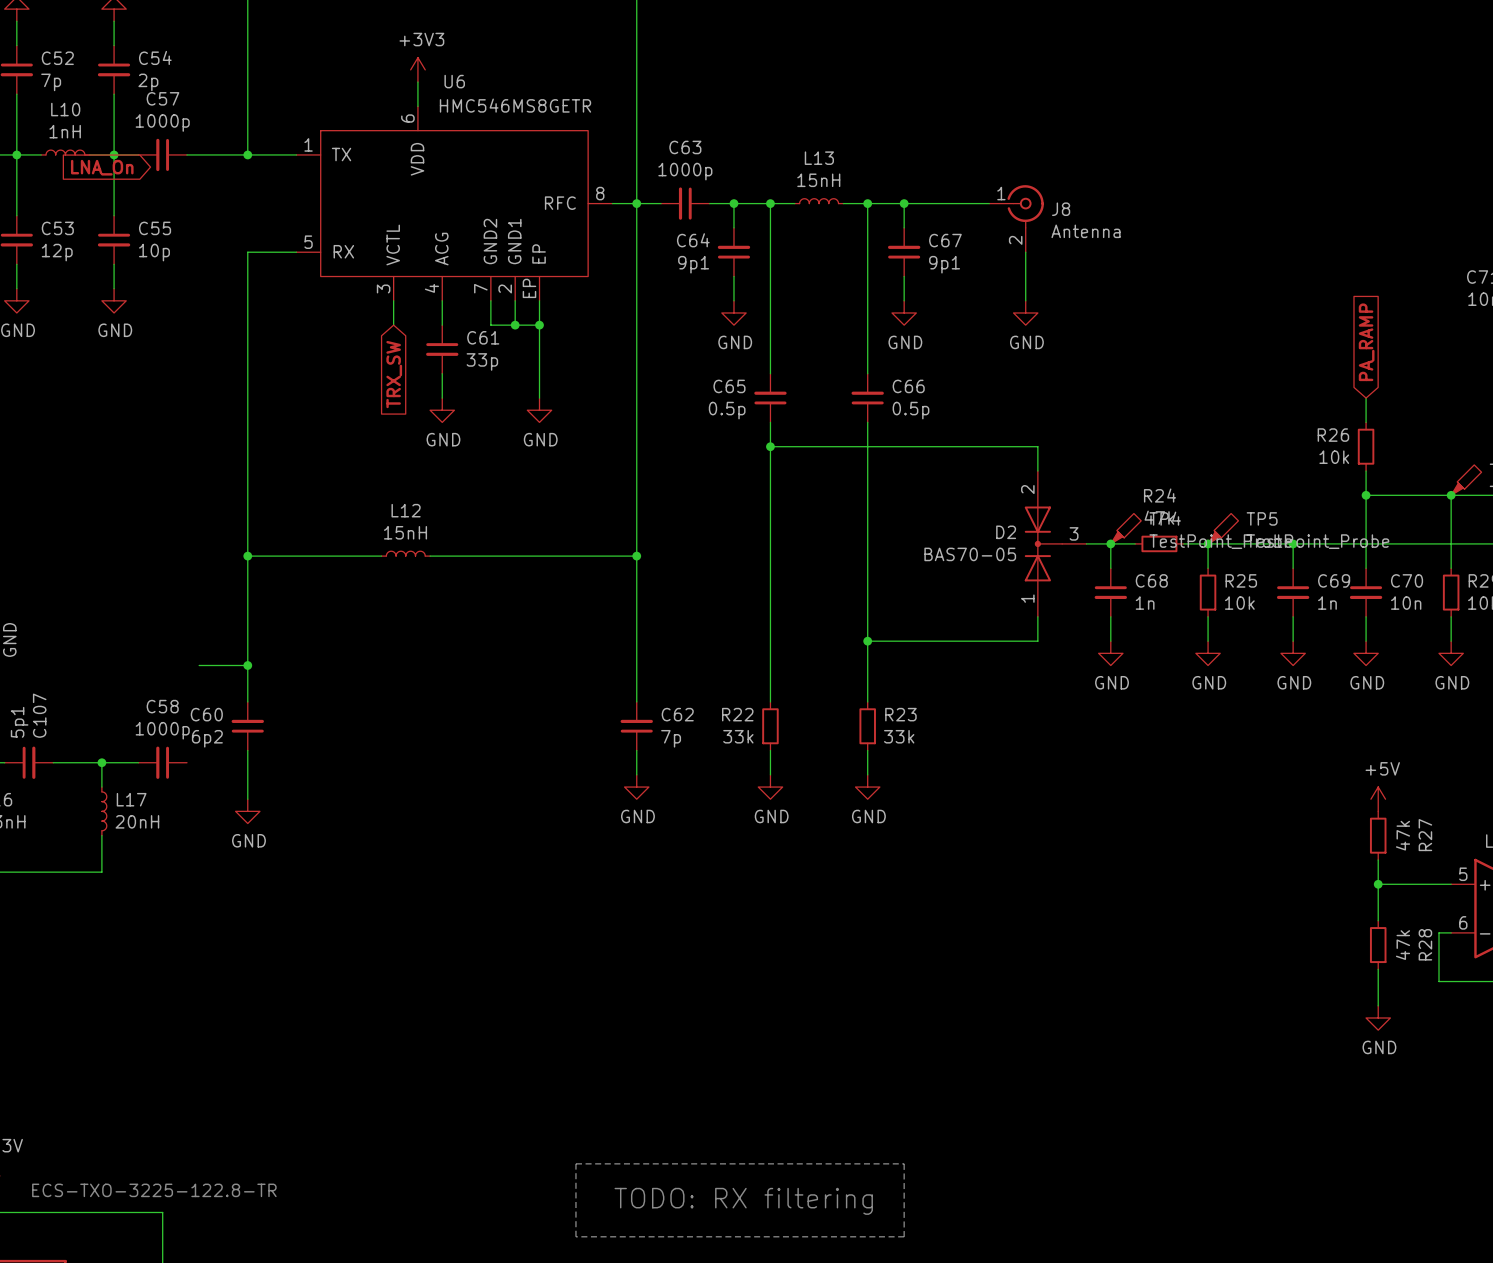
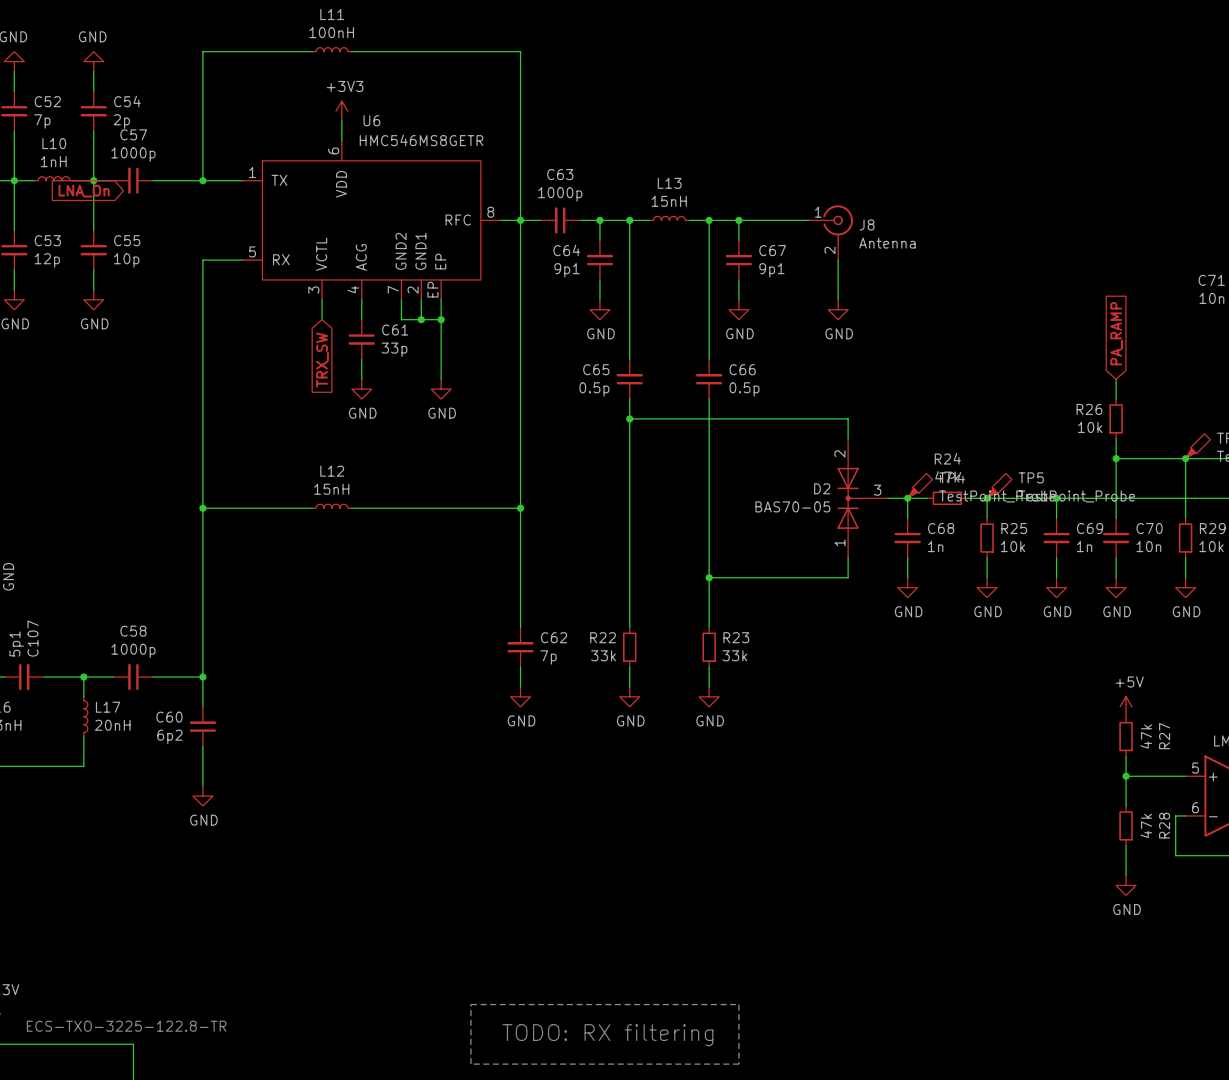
wire: (199, 665) (247, 665) -> none
junction: (247, 665) -> none
C60 position: (247, 726) -> (202, 726)
wire: none -> (153, 677) (202, 677)
junction: none -> (202, 677)
power symbol position: GND (247, 811) -> GND (202, 796)
wire: none -> (202, 746) (202, 786)

